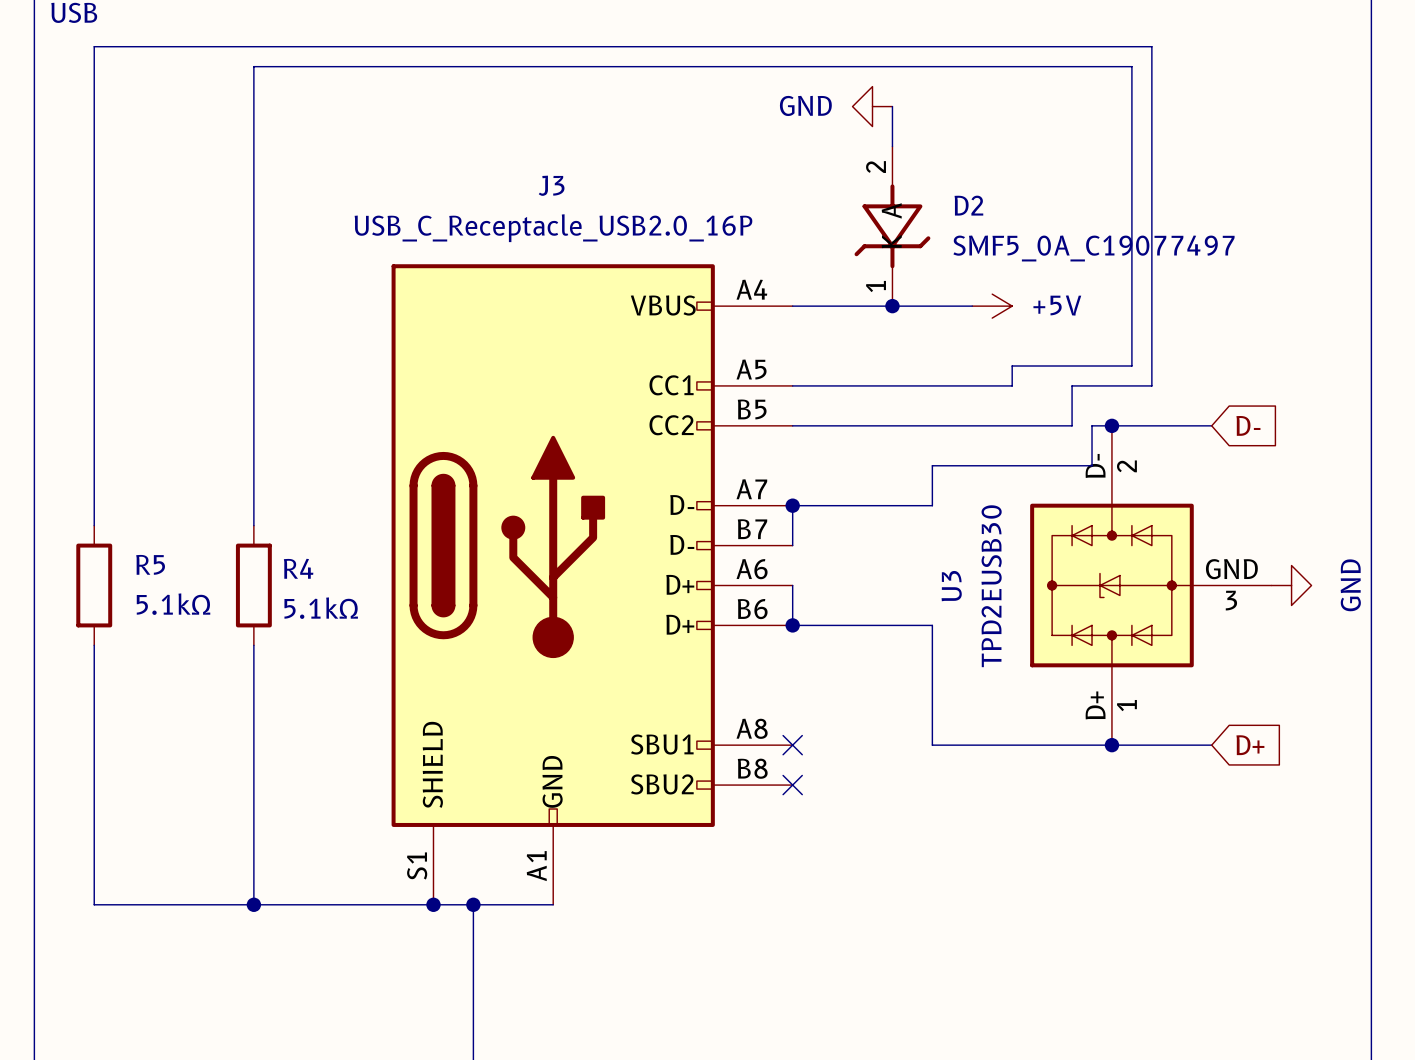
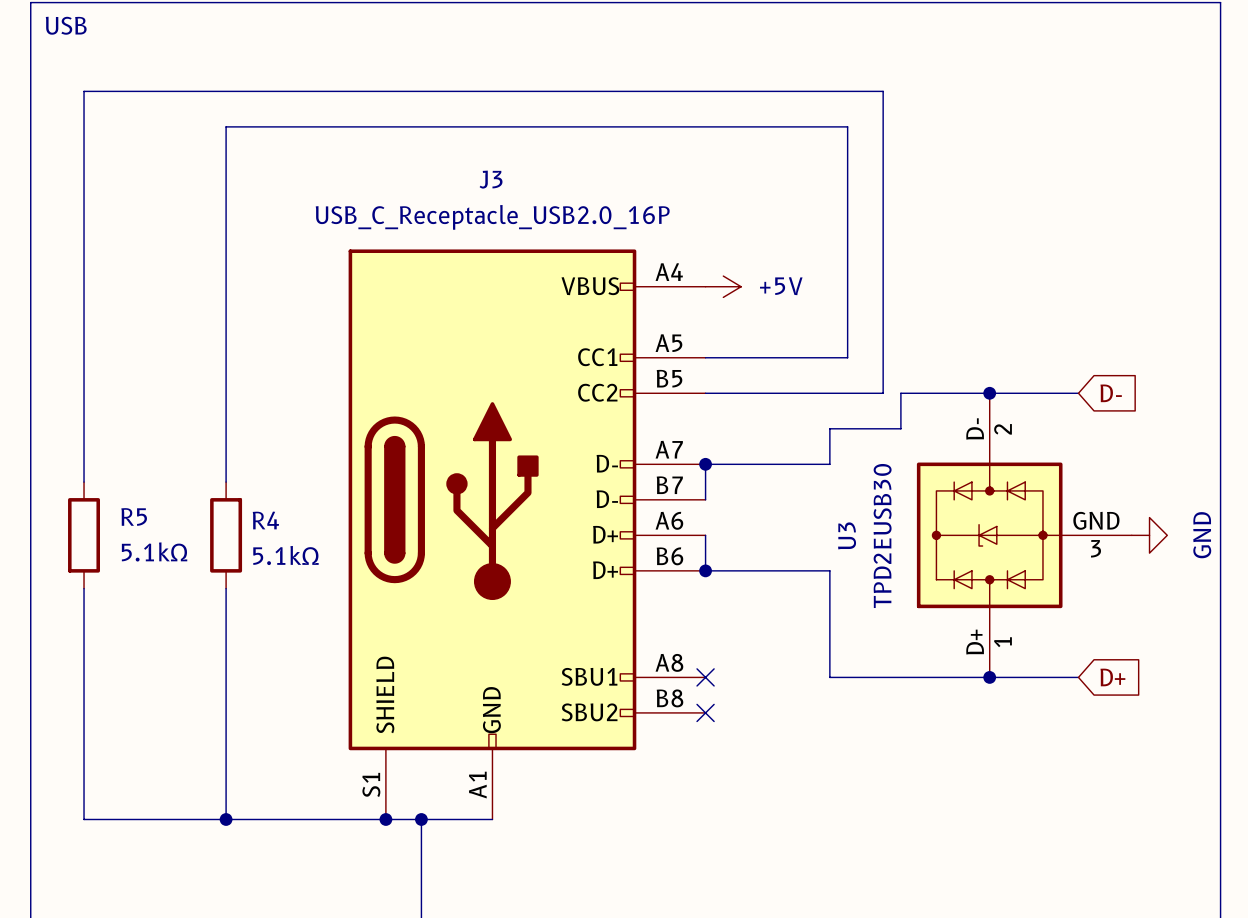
wire: (94, 86) (94, 46) (1151, 46) (1151, 385) (1072, 385) (1072, 425) -> (84, 91) (883, 91) (883, 393)
power symbol: GND (872, 106) -> none
wire: (892, 106) (892, 146) -> none
wire: (253, 126) (253, 66) (1131, 66) (1131, 365) (1012, 365) (1012, 385) (952, 385) -> (226, 126) (847, 126) (847, 357)
D2: SMF5_0A_C19077497 (892, 226) -> none
wire: (792, 306) (972, 306) -> none
junction: (892, 306) -> none
power symbol position: +5V (992, 306) -> +5V (723, 286)
wire: (992, 425) (1012, 425) -> (900, 428) (900, 393)
wire: (1092, 425) (1092, 465) (1012, 465) -> (971, 393) (954, 393)

